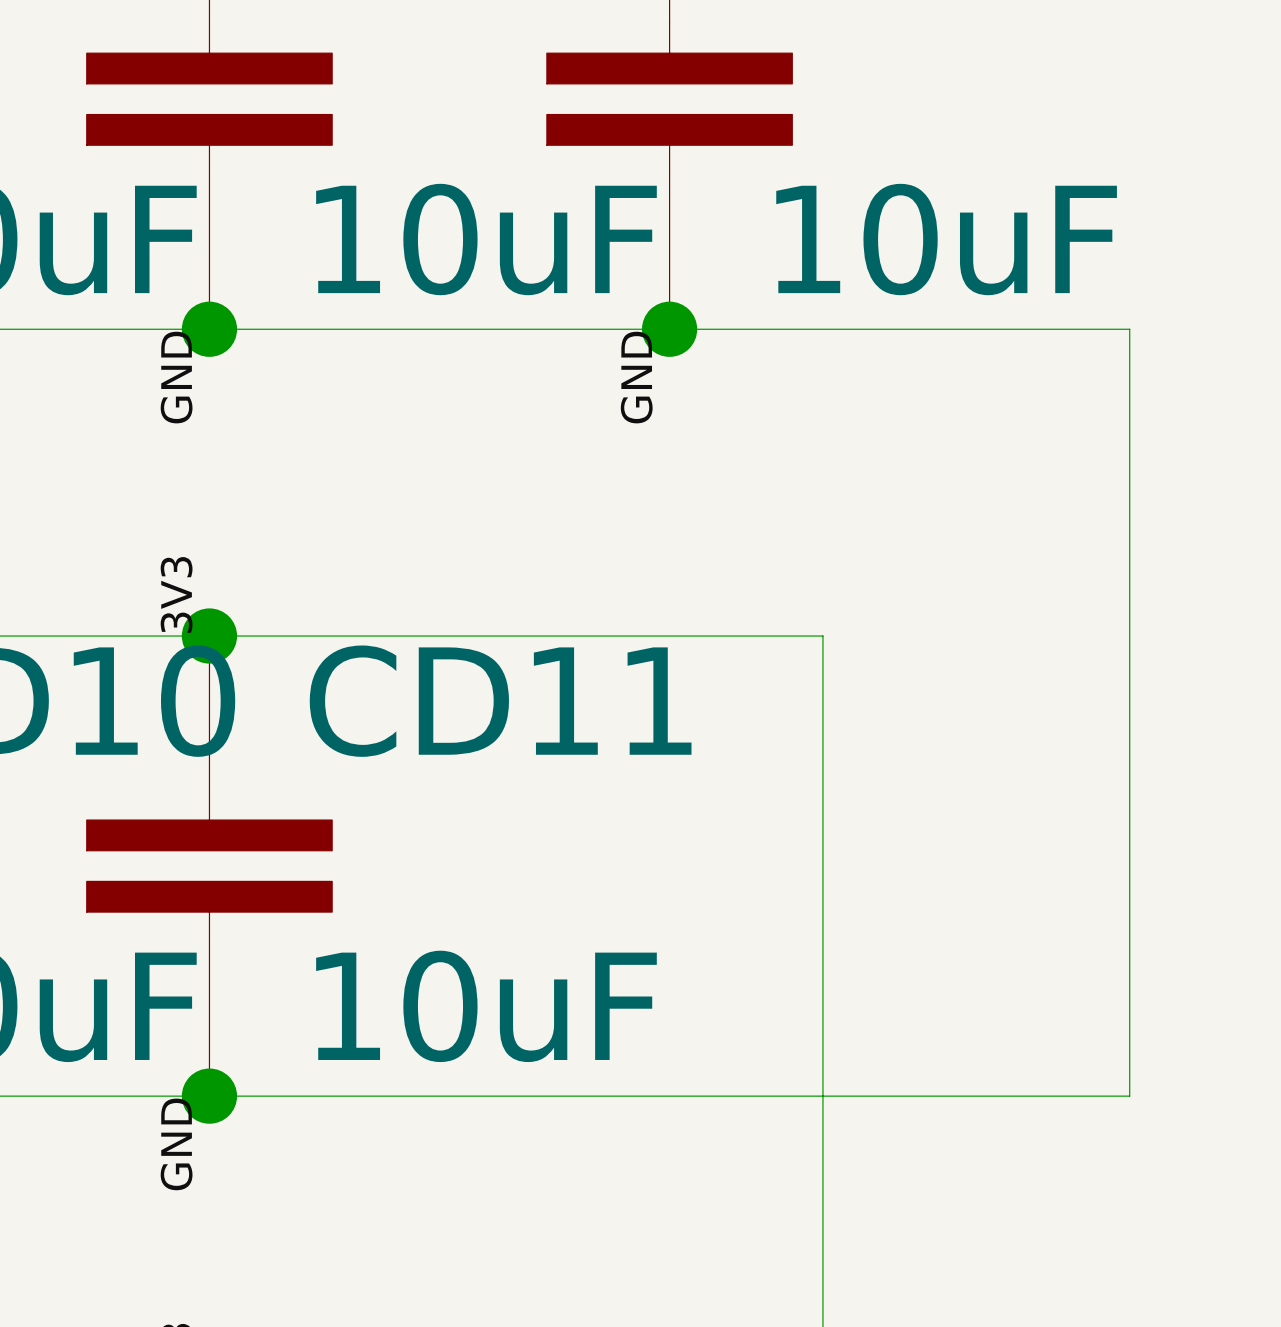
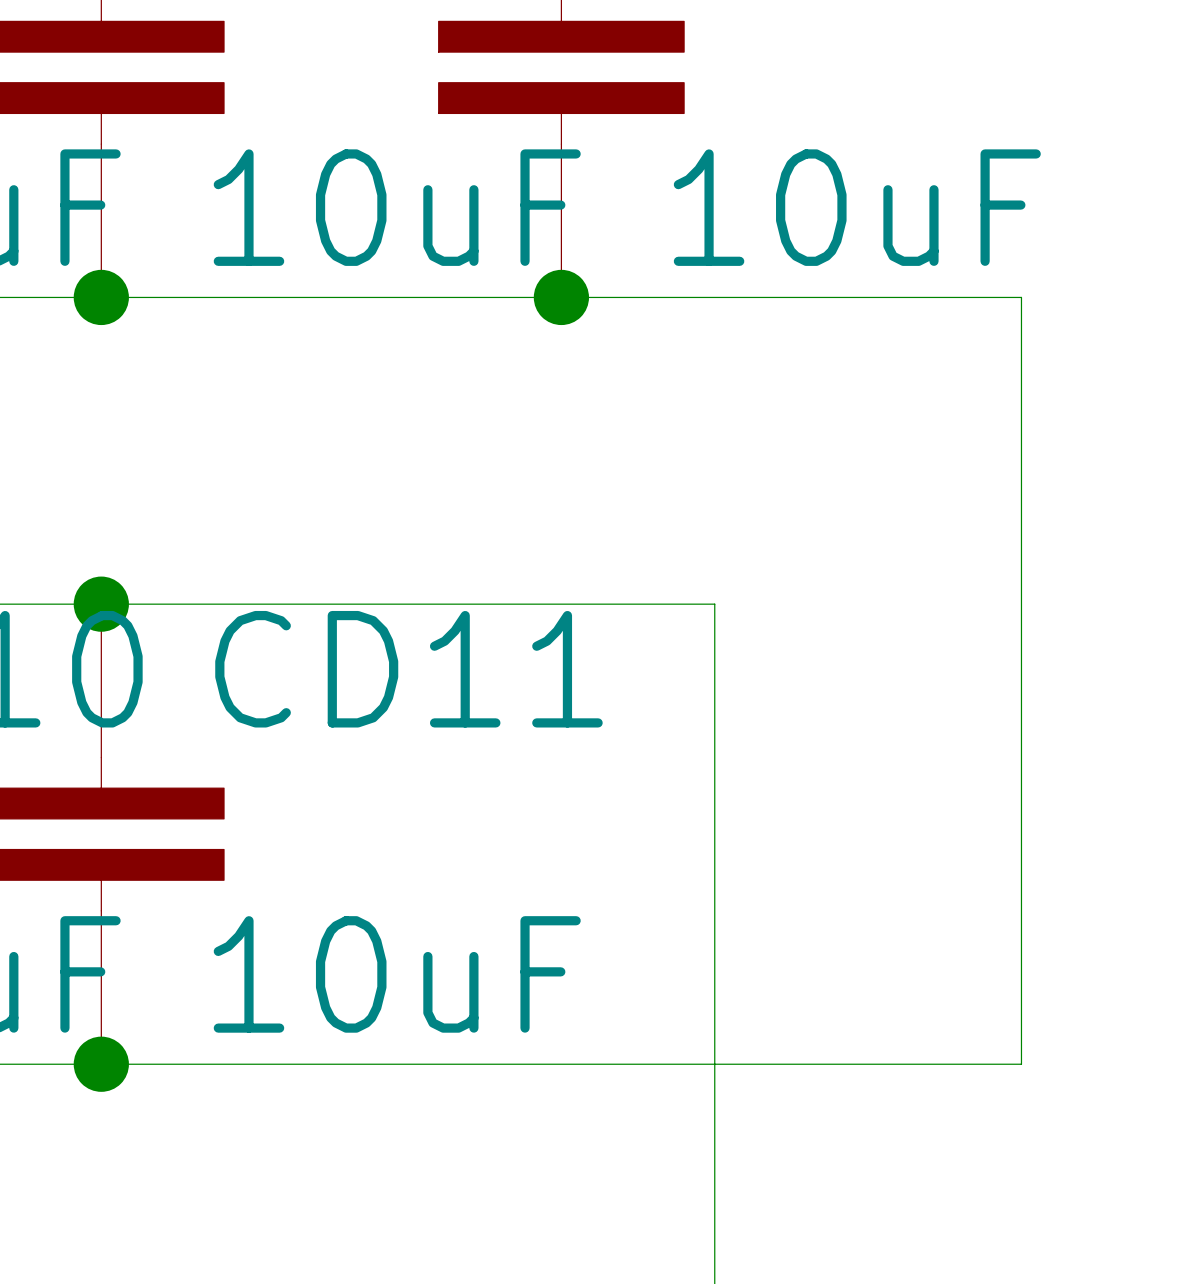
label: GND (176, 377) -> none
label: GND (636, 377) -> none
label: 3V3 (176, 594) -> none
label: GND (176, 1144) -> none

